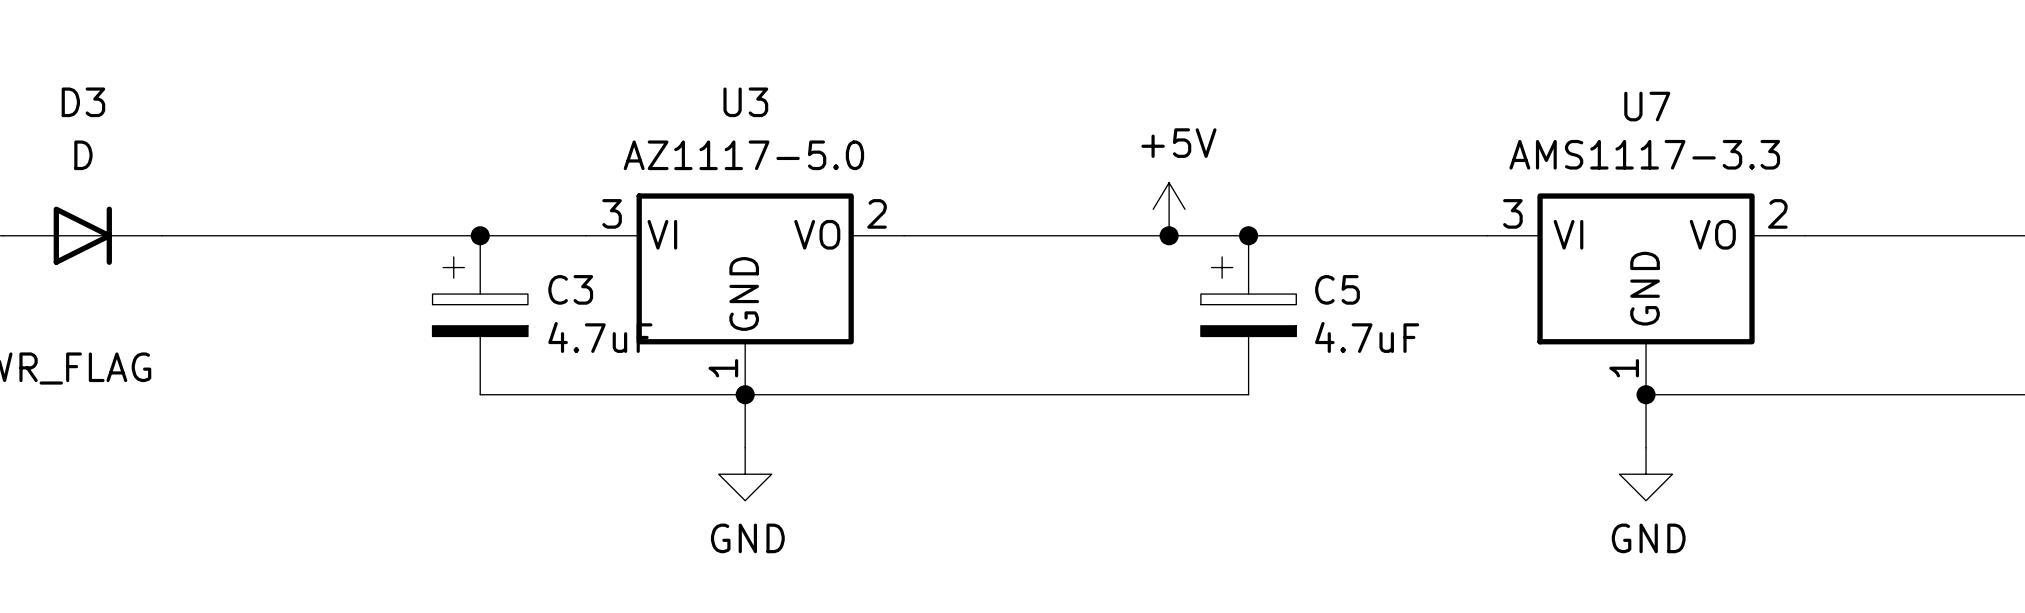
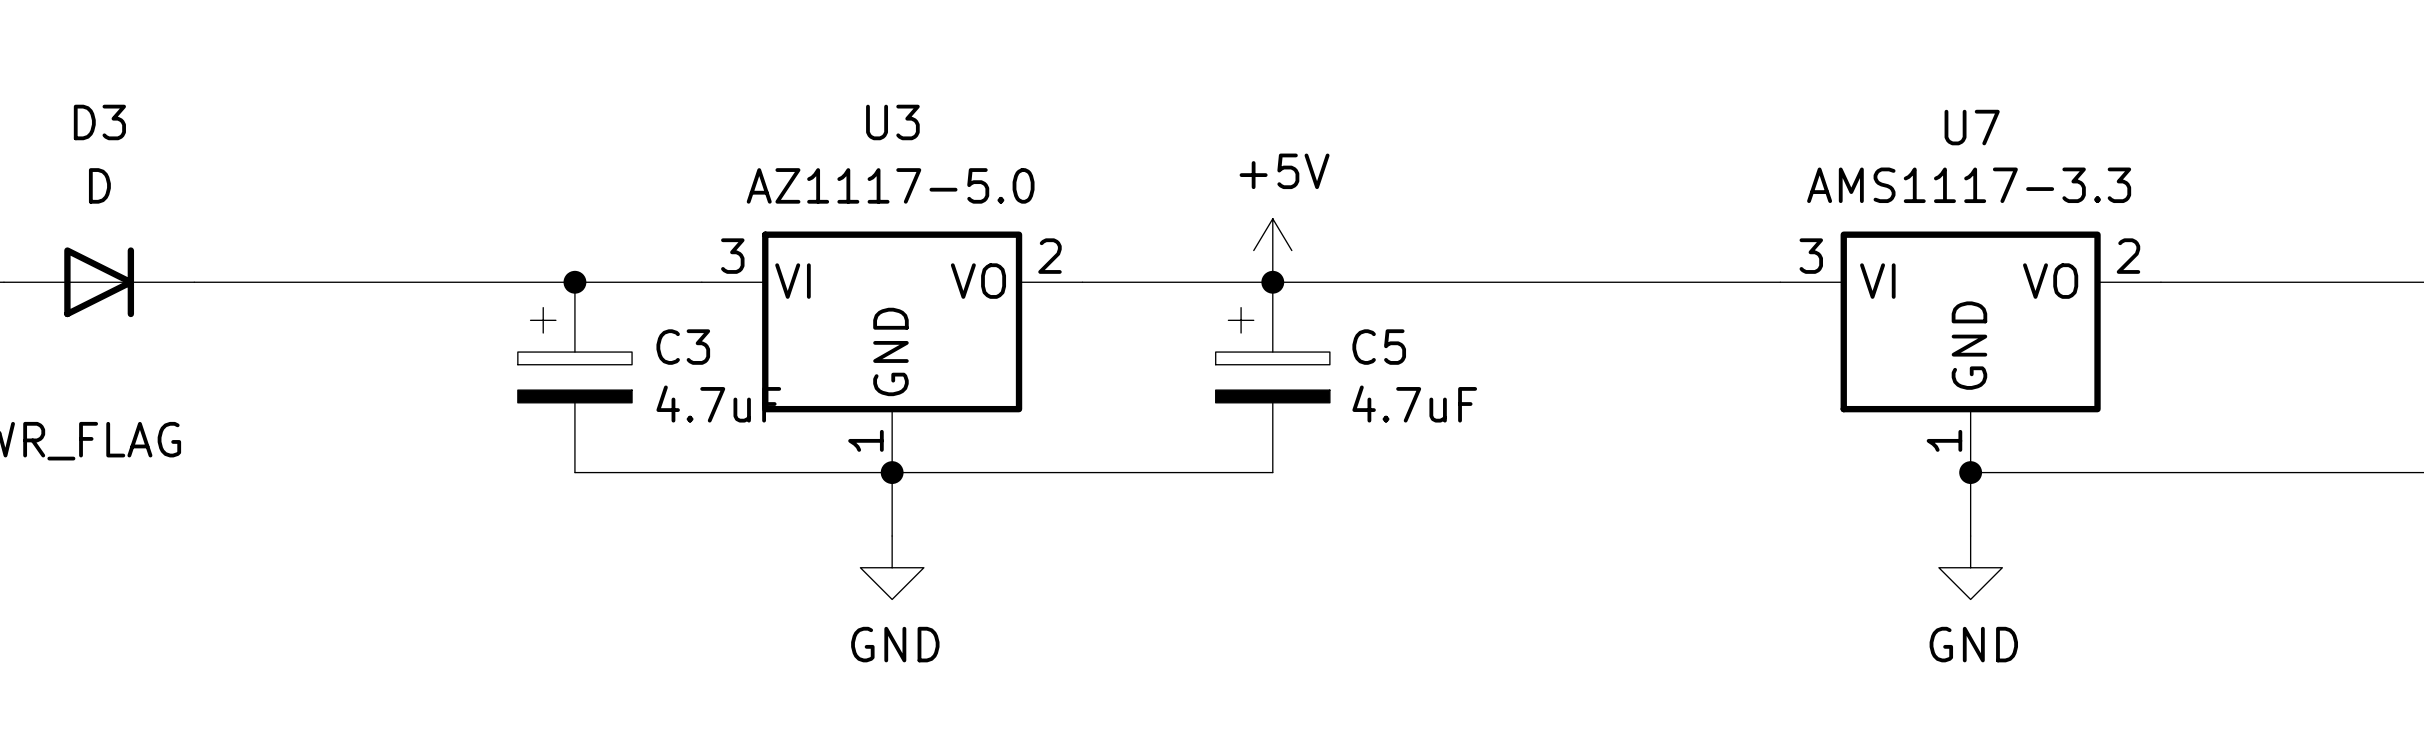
power symbol position: +5V (1169, 209) -> +5V (1272, 250)
junction: none -> (1272, 282)
junction: (1169, 235) -> none
junction: (1248, 235) -> none
C5 position: (1248, 315) -> (1272, 377)
wire: (1063, 394) (1248, 394) -> none

